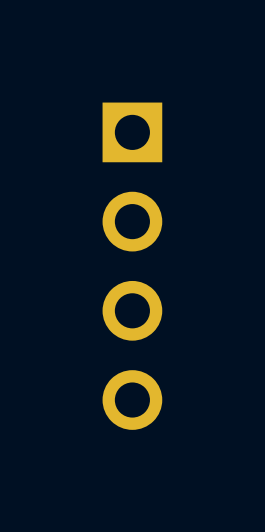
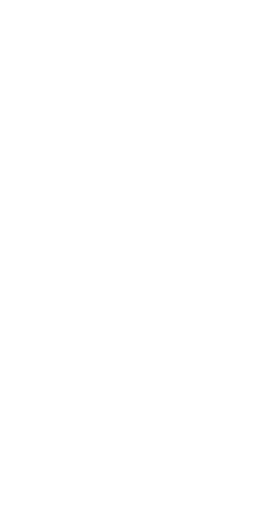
part: (132, 266) -> none

